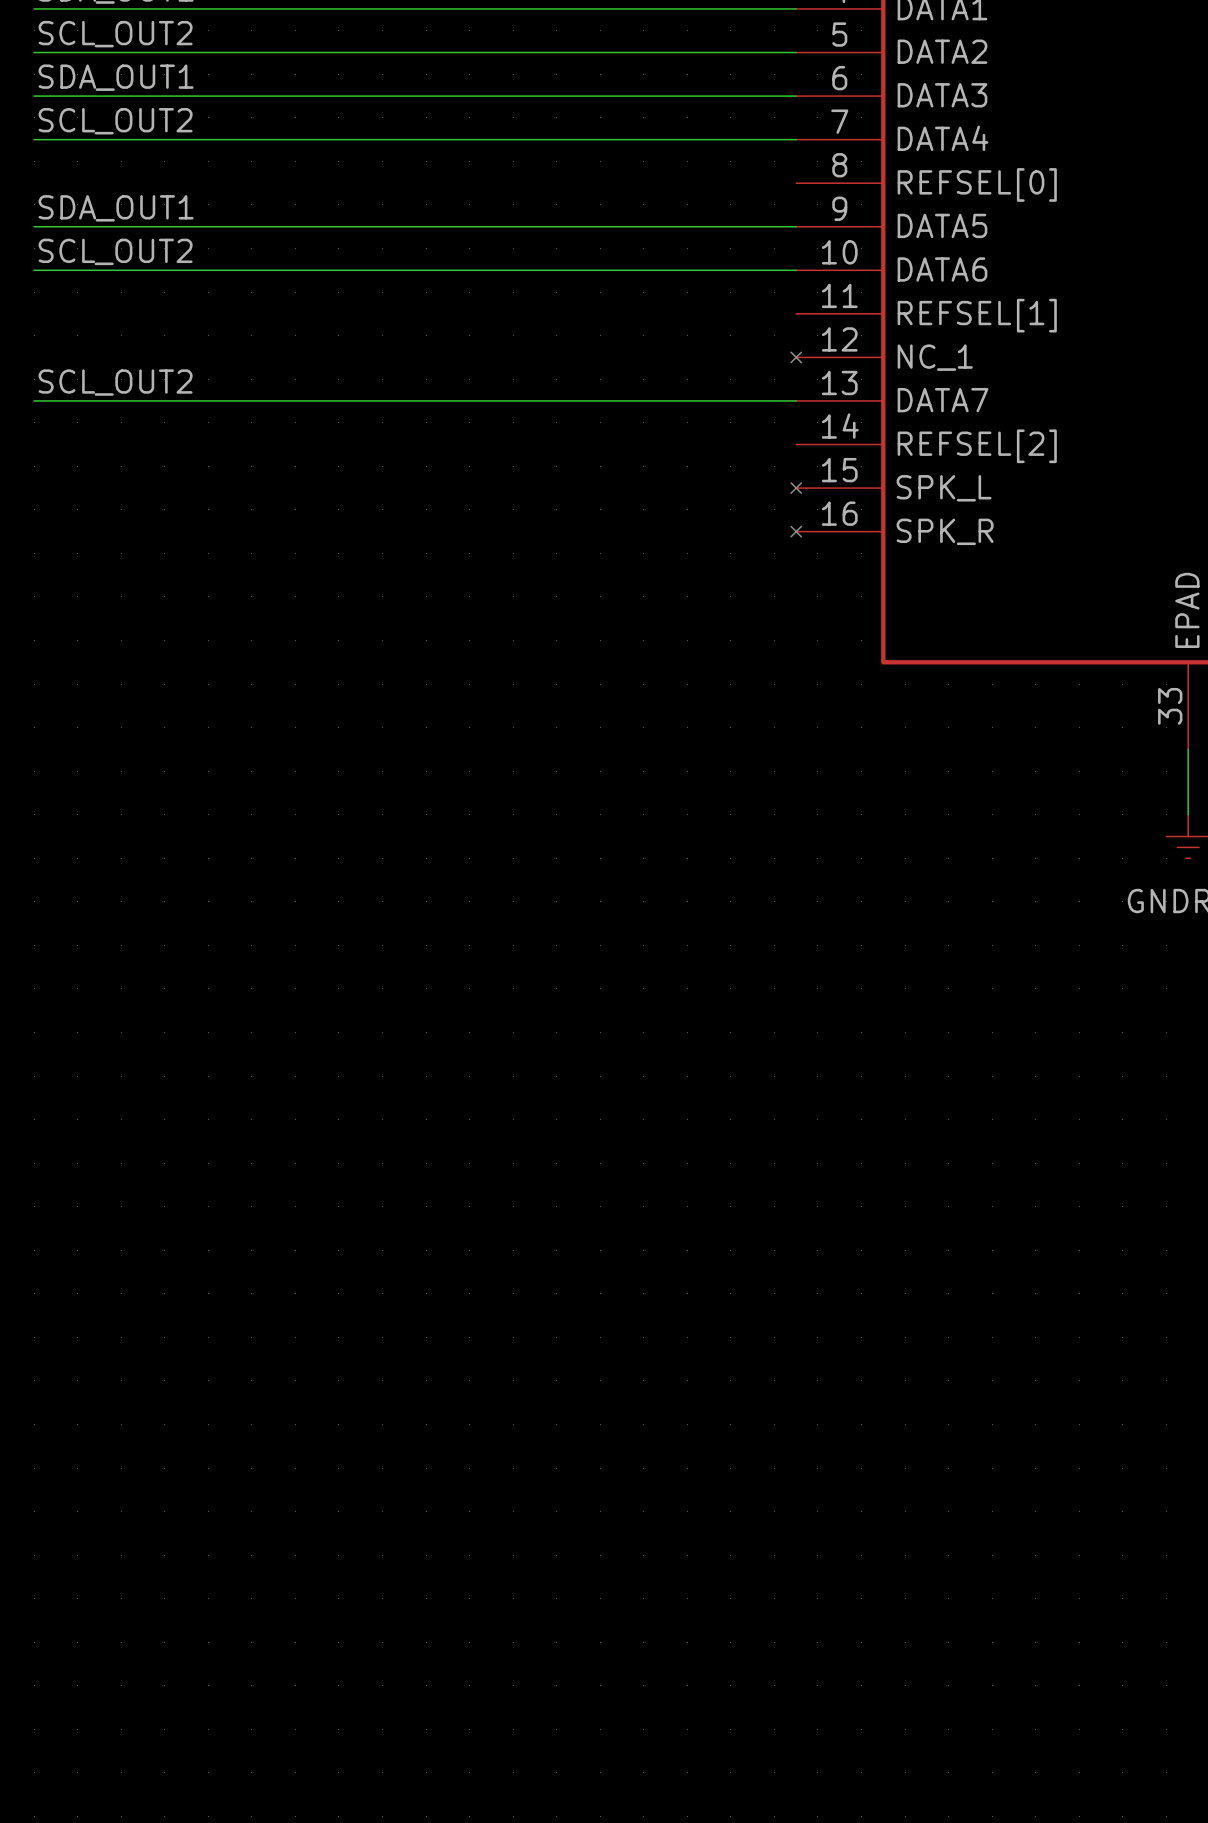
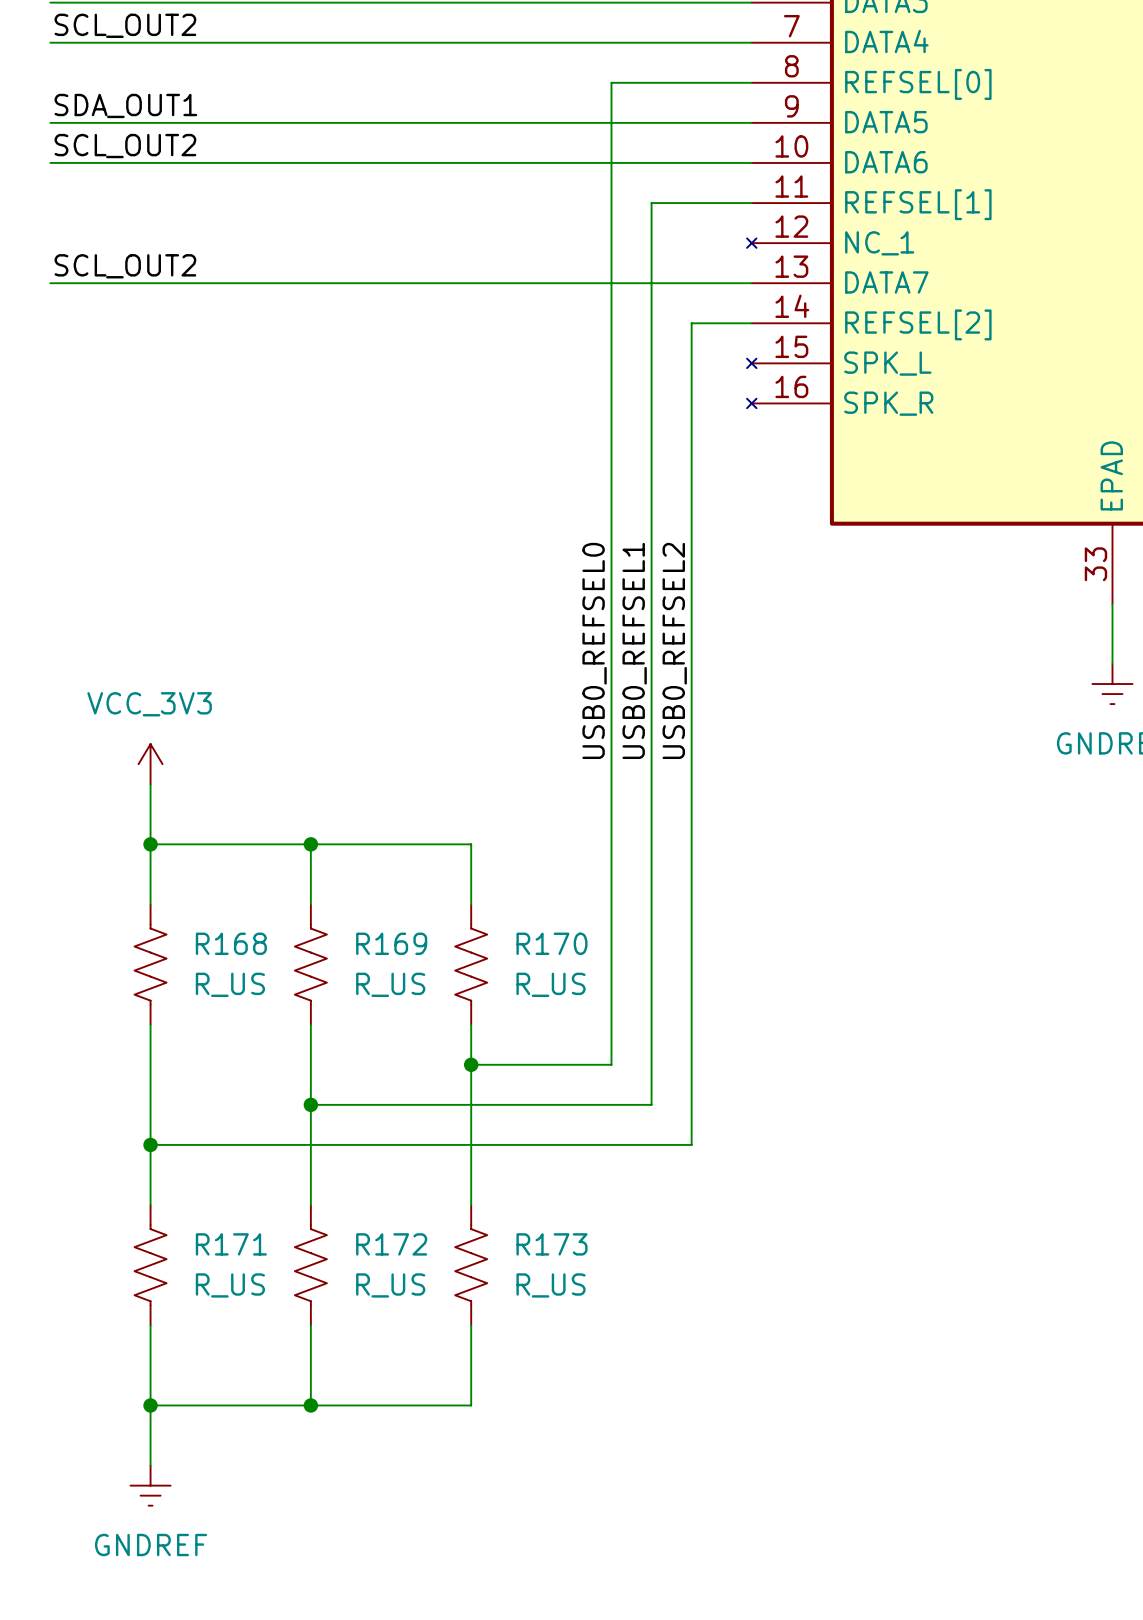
wire: none -> (751, 82) (611, 82) (611, 1064) (471, 1064)
wire: none -> (751, 203) (651, 203) (651, 1104) (310, 1104)
wire: none -> (751, 323) (691, 323) (691, 1144) (150, 1144)
label: none -> USB0_REFSEL0 (594, 650)
label: none -> USB0_REFSEL1 (634, 650)
label: none -> USB0_REFSEL2 (674, 650)
power symbol: none -> VCC_3V3 (150, 764)
wire: none -> (150, 784) (150, 904)
wire: none -> (150, 844) (471, 844) (471, 904)
junction: none -> (150, 844)
wire: none -> (310, 844) (310, 904)
junction: none -> (310, 844)
R168: none -> R_US (150, 964)
R169: none -> R_US (310, 964)
R170: none -> R_US (471, 964)
wire: none -> (150, 1024) (150, 1205)
wire: none -> (310, 1024) (310, 1205)
wire: none -> (471, 1024) (471, 1205)
junction: none -> (471, 1064)
junction: none -> (310, 1104)
junction: none -> (150, 1144)
R171: none -> R_US (150, 1265)
R172: none -> R_US (310, 1265)
R173: none -> R_US (471, 1265)
wire: none -> (150, 1325) (150, 1465)
wire: none -> (310, 1325) (310, 1405)
wire: none -> (471, 1325) (471, 1405) (150, 1405)
junction: none -> (150, 1405)
junction: none -> (310, 1405)
power symbol: none -> GNDREF (150, 1485)

